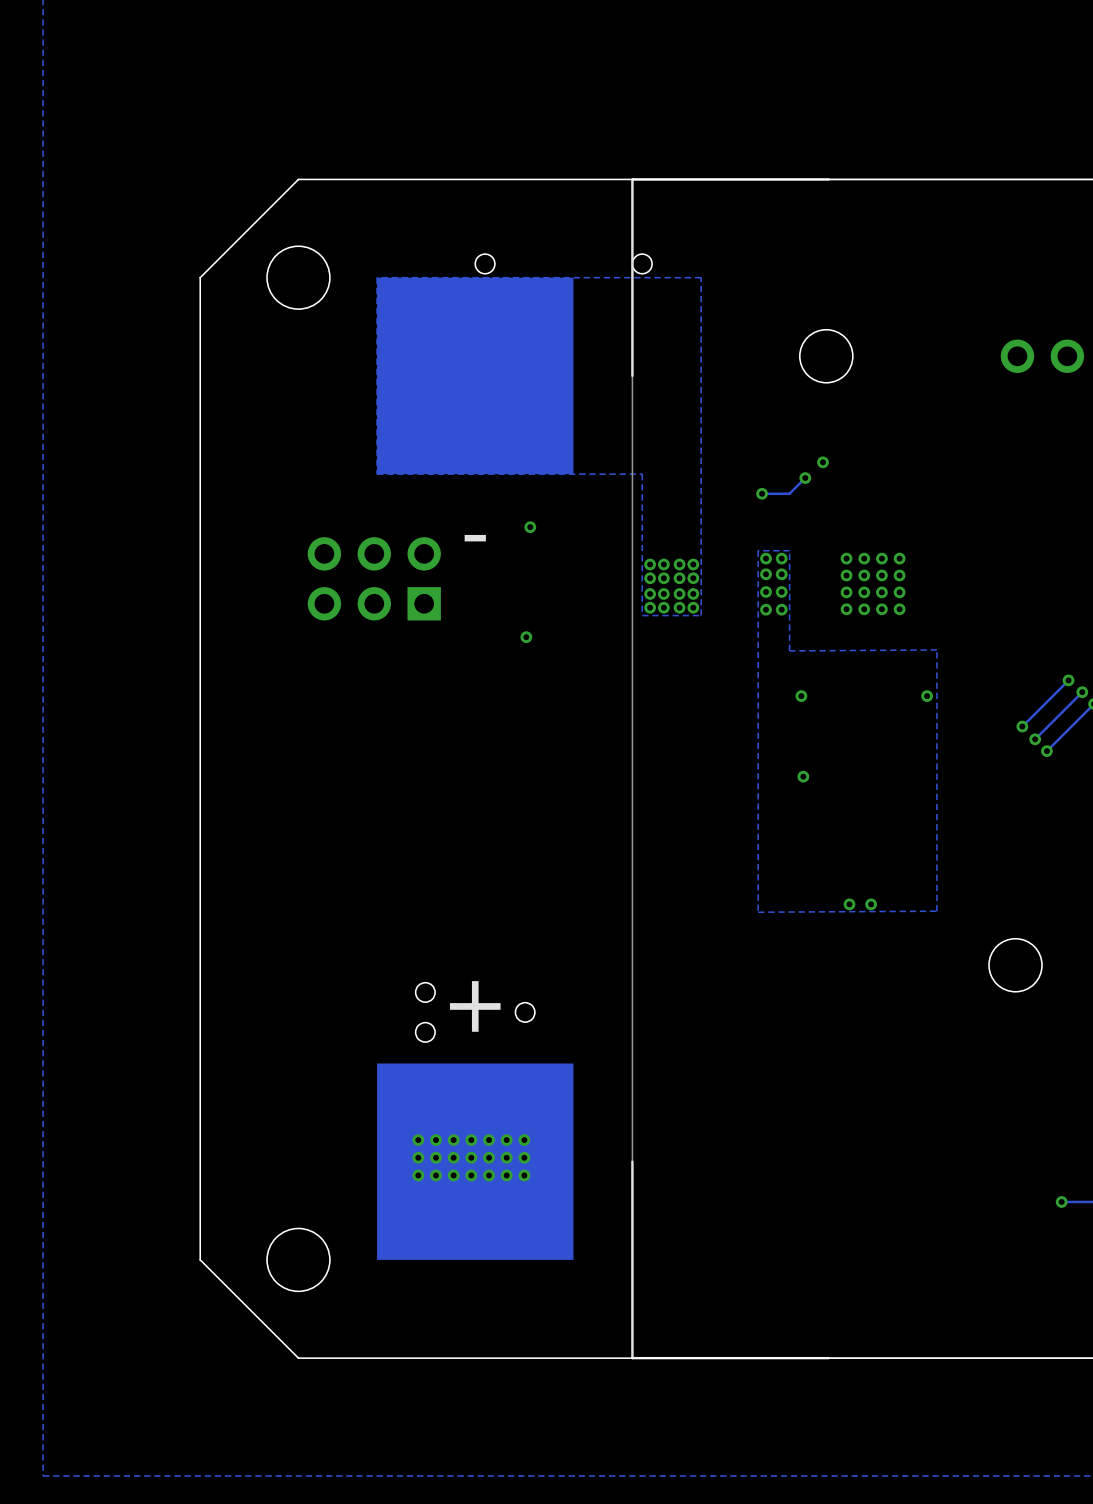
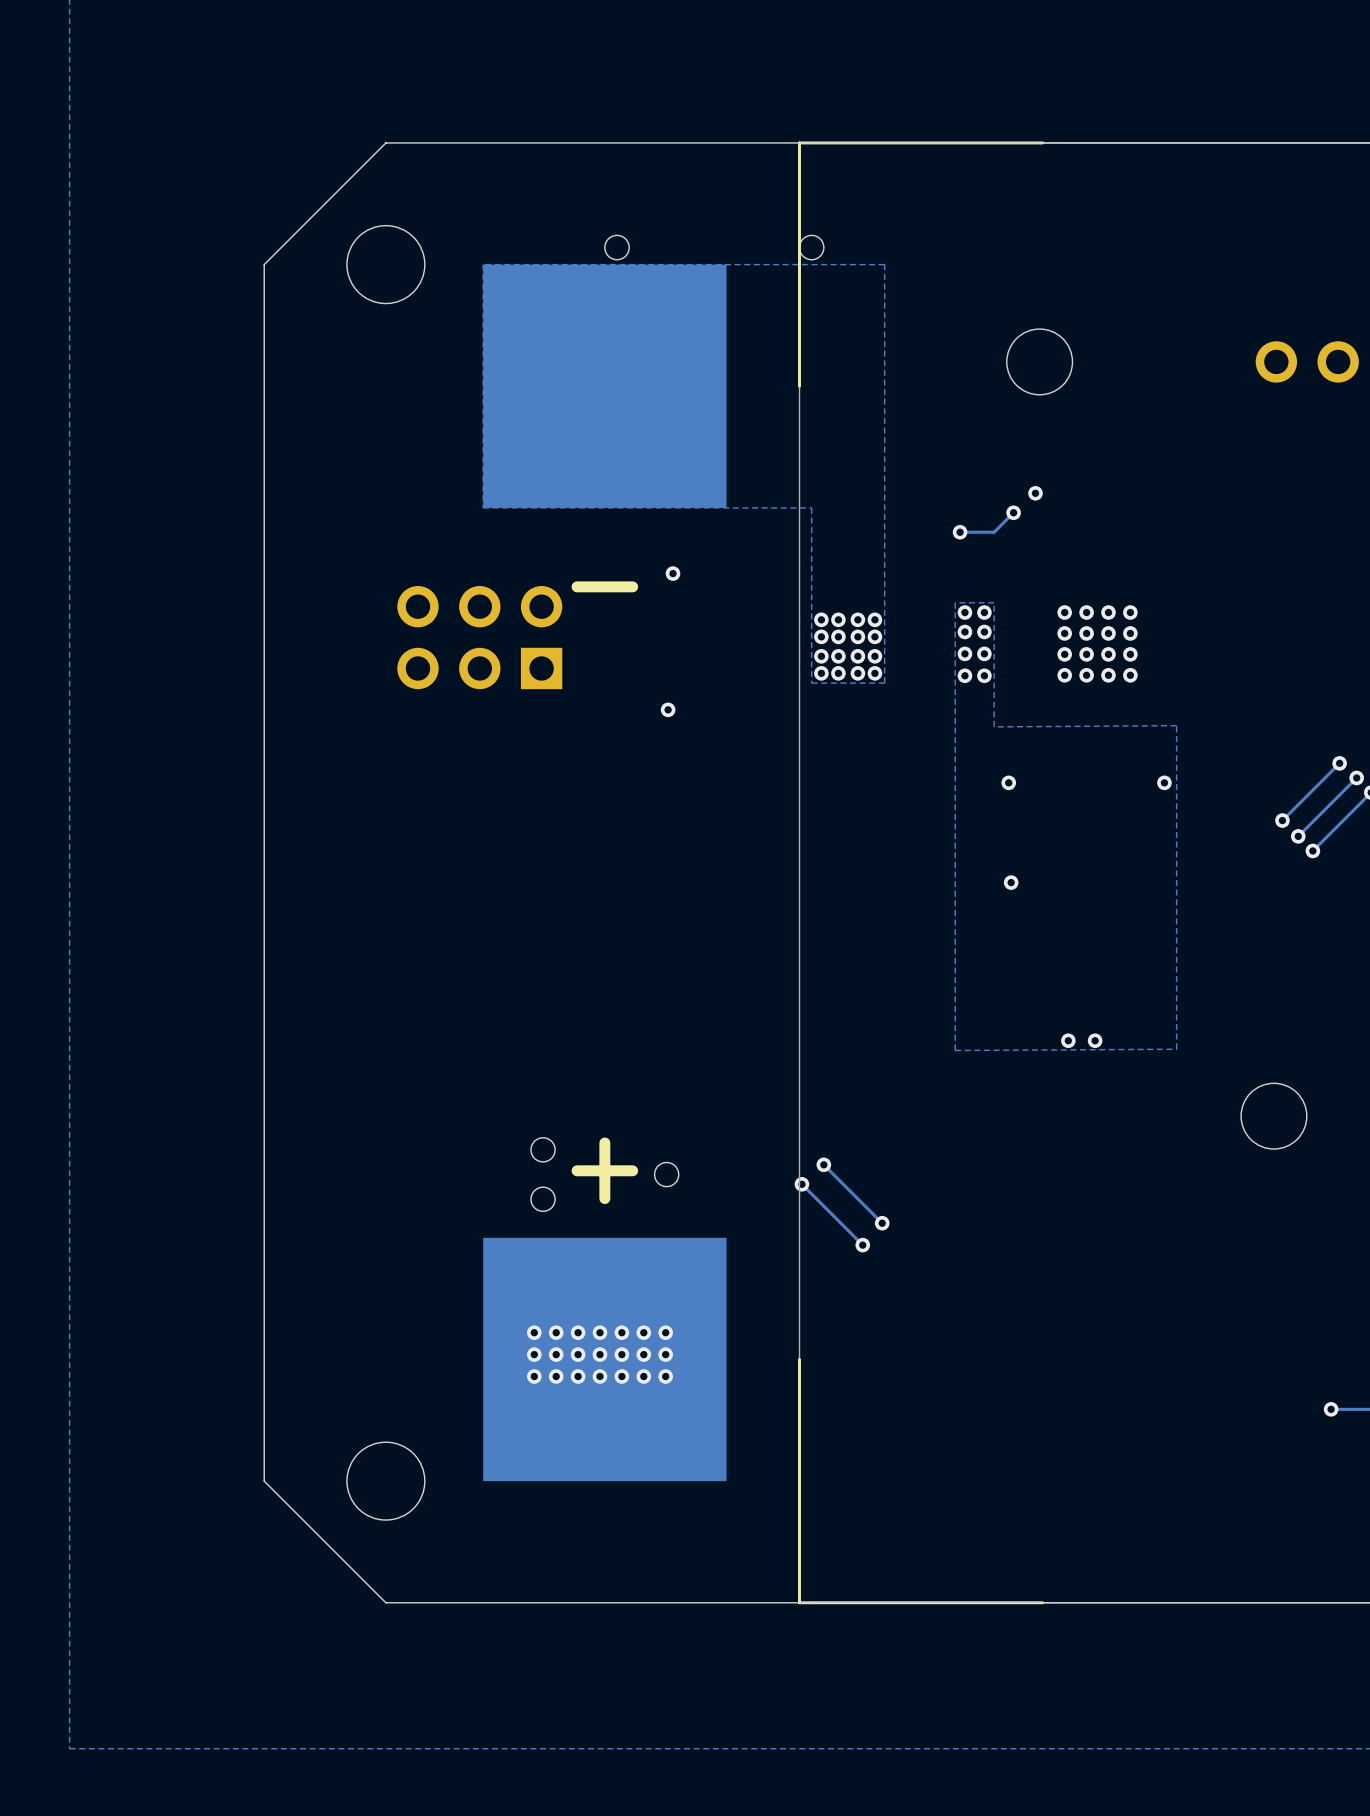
track: none -> (823, 1164) (882, 1223)
via: none -> (823, 1164)
track: none -> (801, 1184) (862, 1245)
via: none -> (801, 1184)
via: none -> (882, 1223)
via: none -> (862, 1245)

